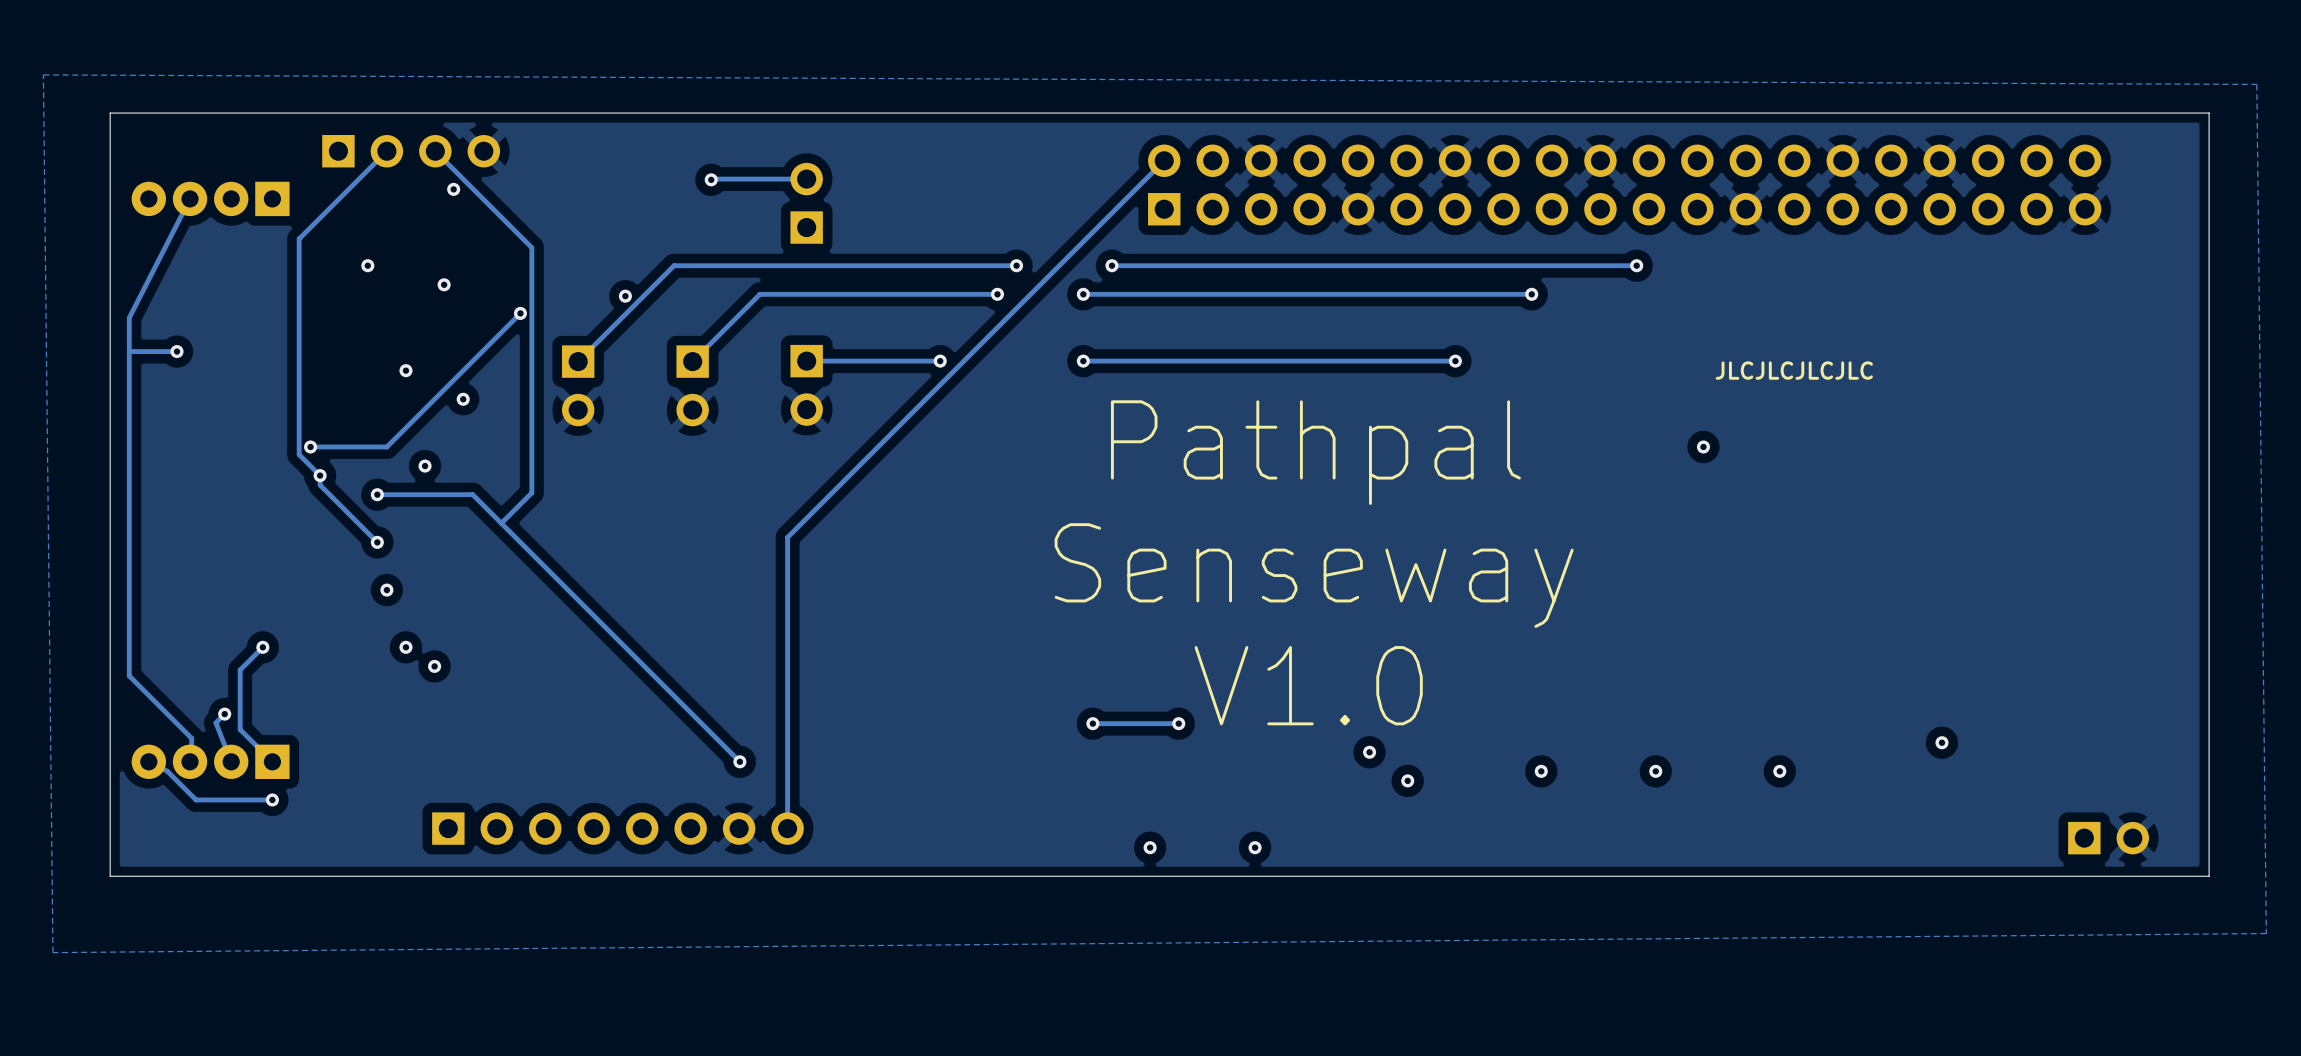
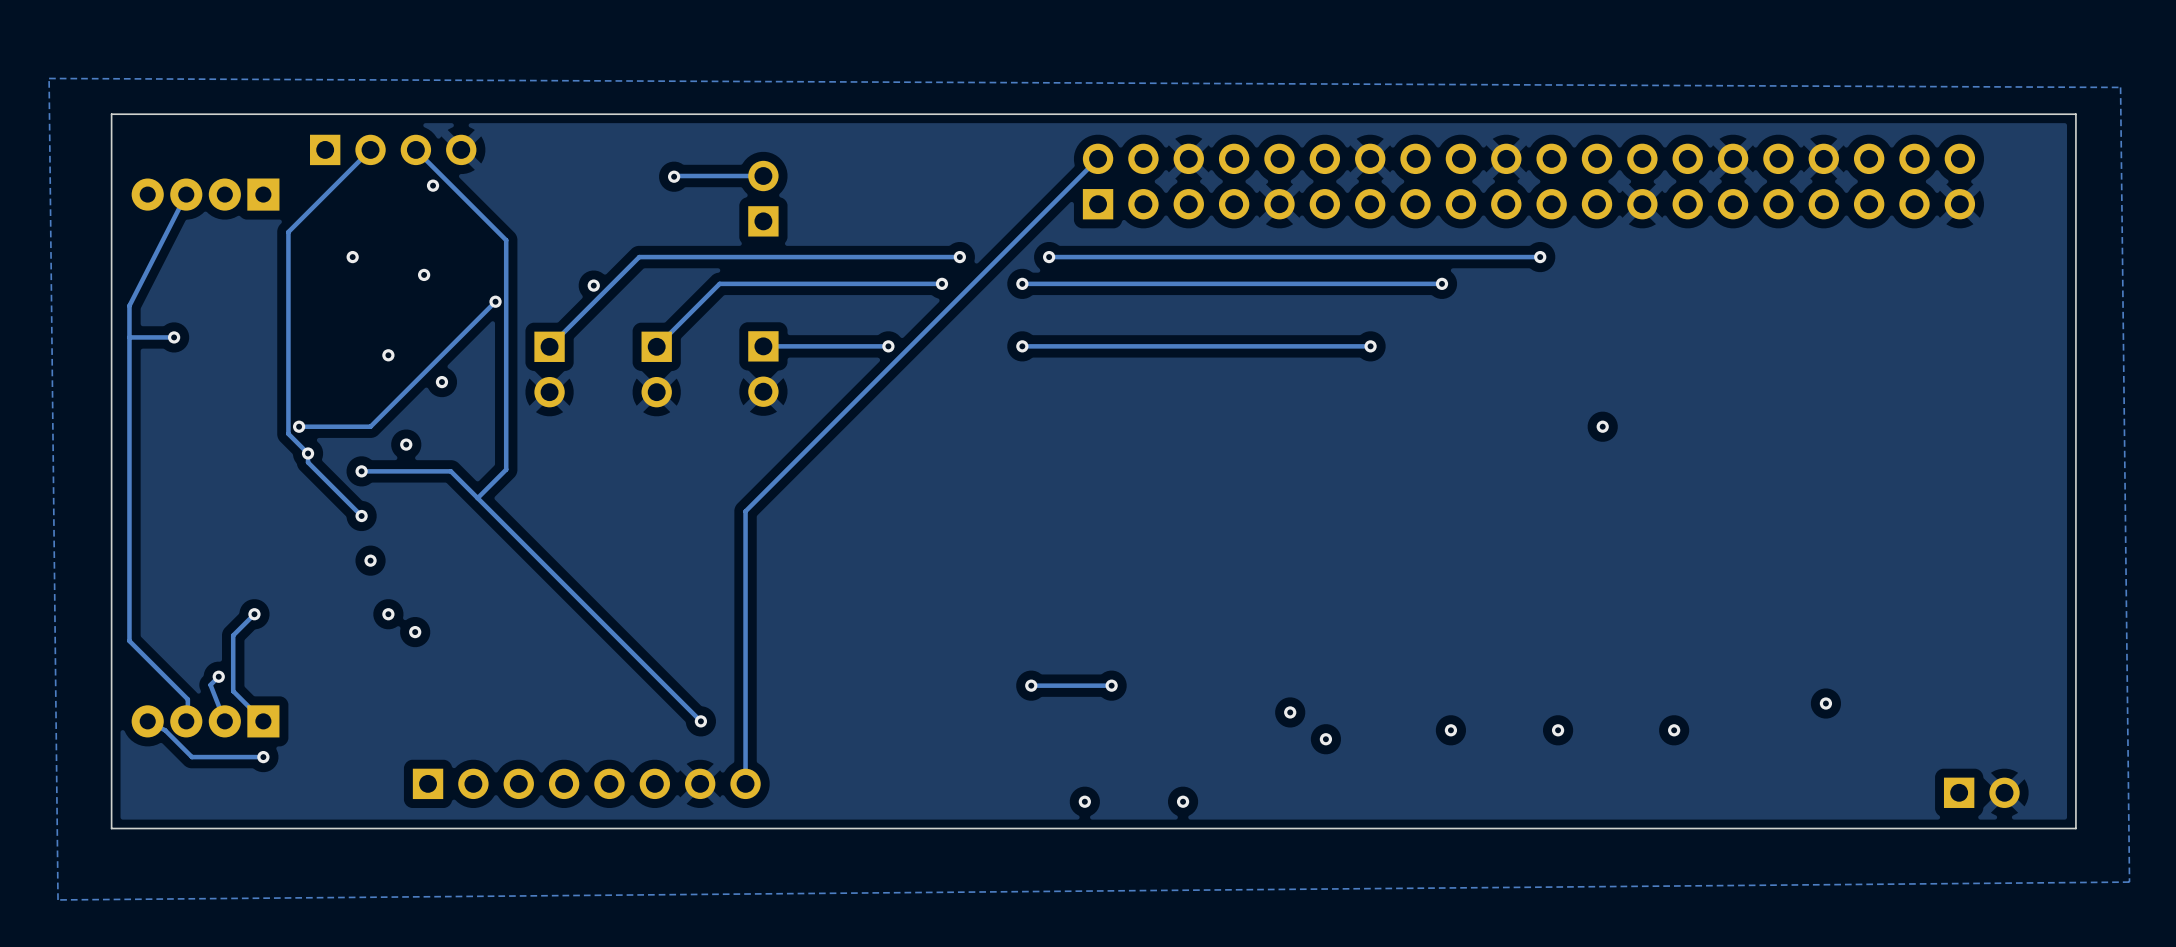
text: JLCJLCJLCJLC (1794, 370) -> none
text: Pathpal (1315, 452) -> none
text: Senseway (1314, 575) -> none
text: V1.0 (1308, 685) -> none

